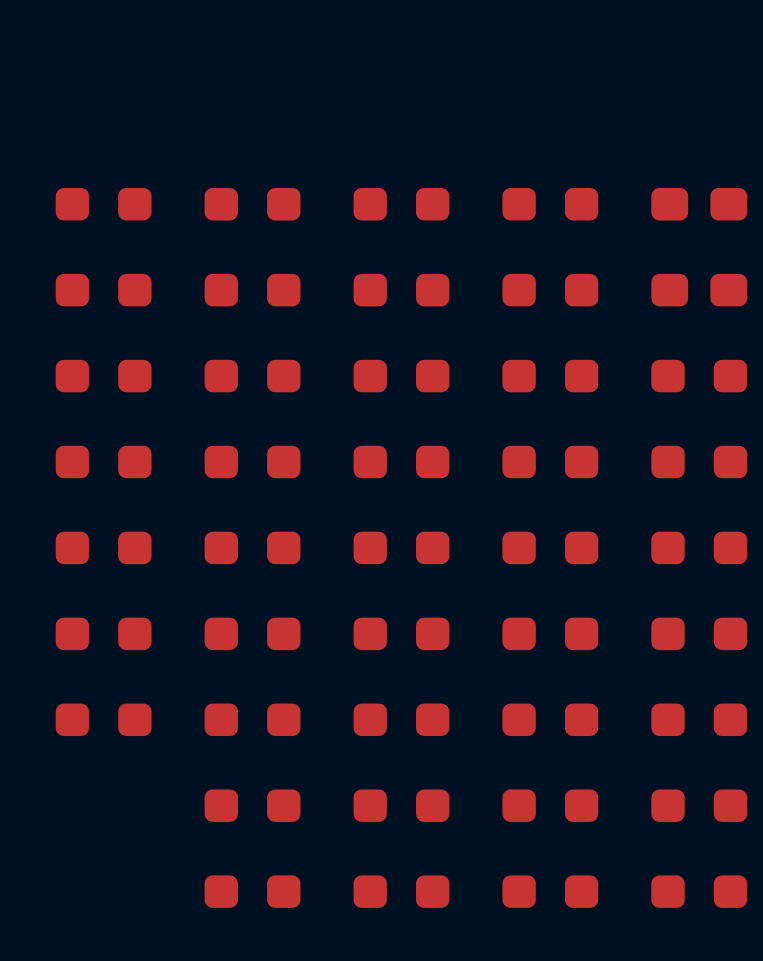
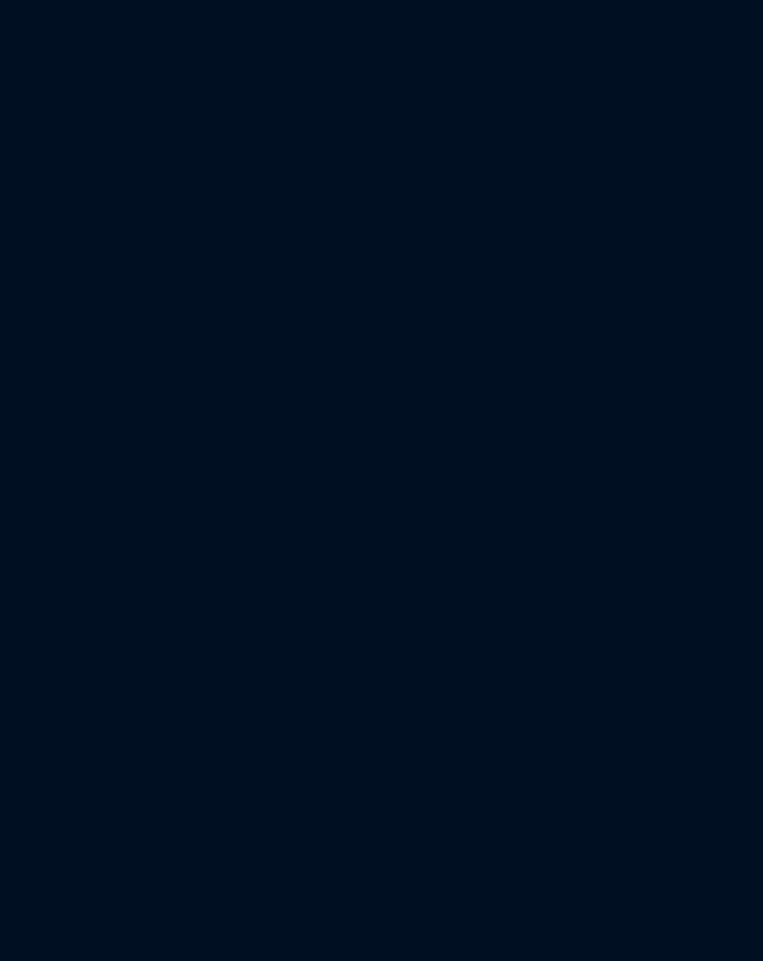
part: (103, 204) -> none
part: (252, 204) -> none
part: (401, 204) -> none
part: (550, 204) -> none
part: (699, 204) -> none
part: (103, 290) -> none
part: (252, 290) -> none
part: (401, 290) -> none
part: (550, 290) -> none
part: (699, 290) -> none
part: (103, 376) -> none
part: (252, 376) -> none
part: (401, 376) -> none
part: (550, 376) -> none
part: (699, 376) -> none
part: (103, 462) -> none
part: (252, 462) -> none
part: (401, 462) -> none
part: (550, 462) -> none
part: (699, 462) -> none
part: (103, 547) -> none
part: (252, 547) -> none
part: (401, 547) -> none
part: (550, 547) -> none
part: (699, 547) -> none
part: (103, 633) -> none
part: (252, 633) -> none
part: (401, 633) -> none
part: (550, 633) -> none
part: (699, 633) -> none
part: (103, 719) -> none
part: (252, 719) -> none
part: (401, 719) -> none
part: (550, 719) -> none
part: (699, 719) -> none
part: (252, 805) -> none
part: (401, 805) -> none
part: (550, 805) -> none
part: (699, 805) -> none
part: (252, 891) -> none
part: (401, 891) -> none
part: (550, 891) -> none
part: (699, 891) -> none

